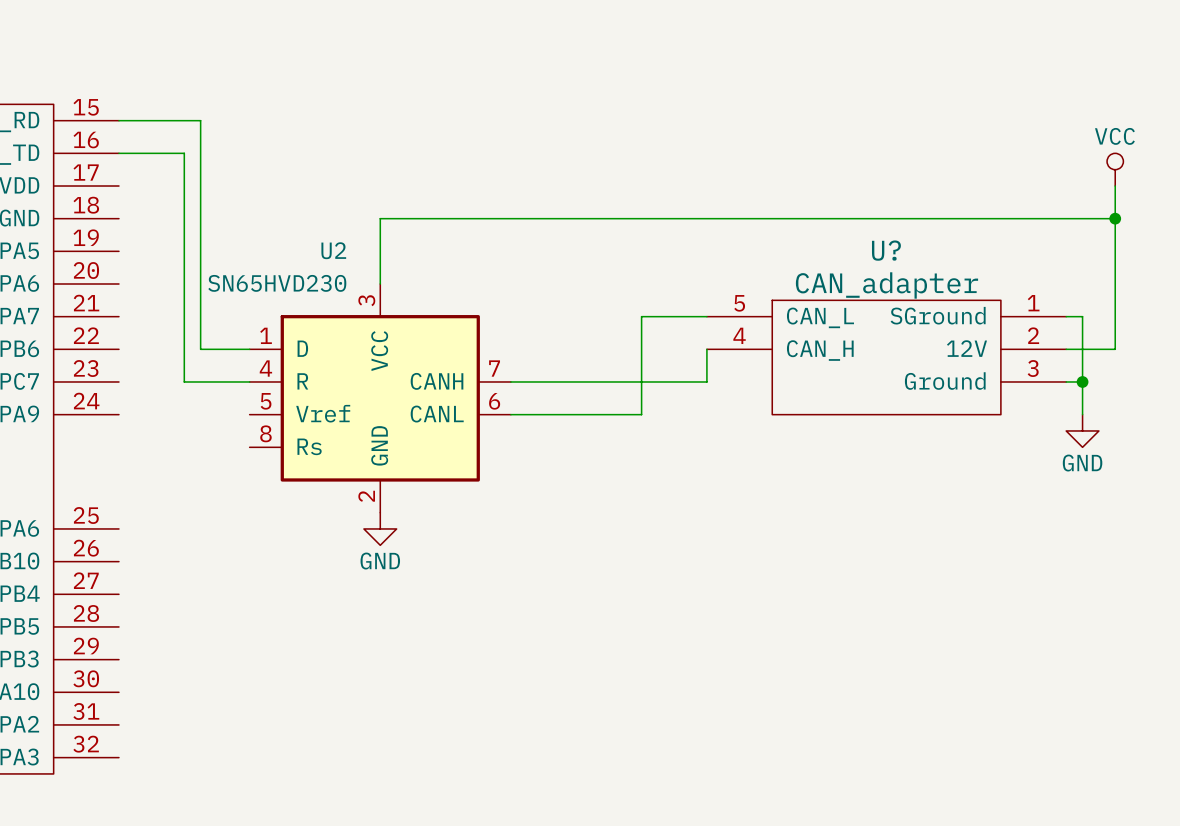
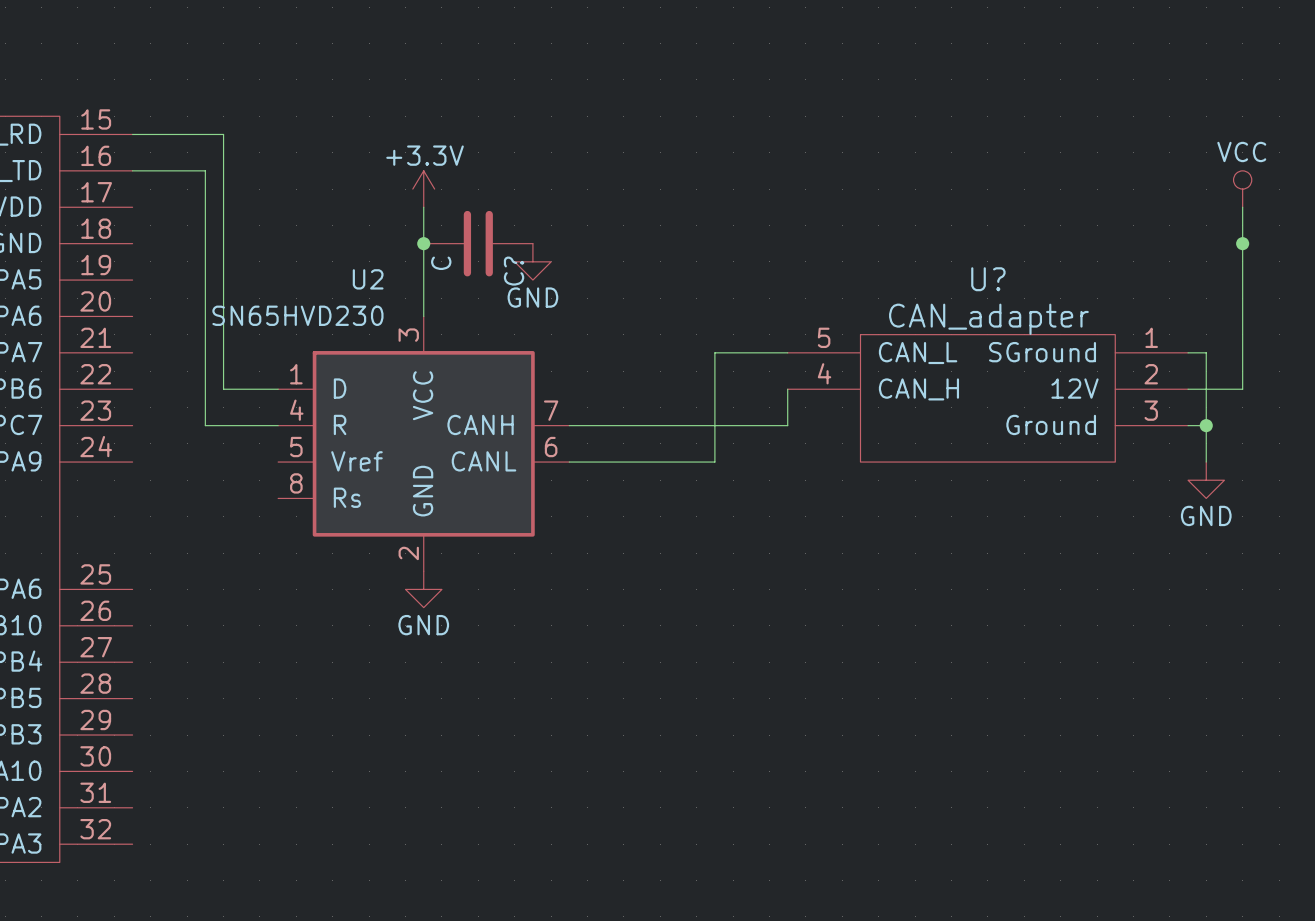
power symbol: none -> +3.3V (423, 189)
wire: (380, 218) (1115, 218) -> (423, 243) (423, 207)
junction: none -> (423, 243)
C?: none -> C (478, 243)
power symbol: none -> GND (532, 261)

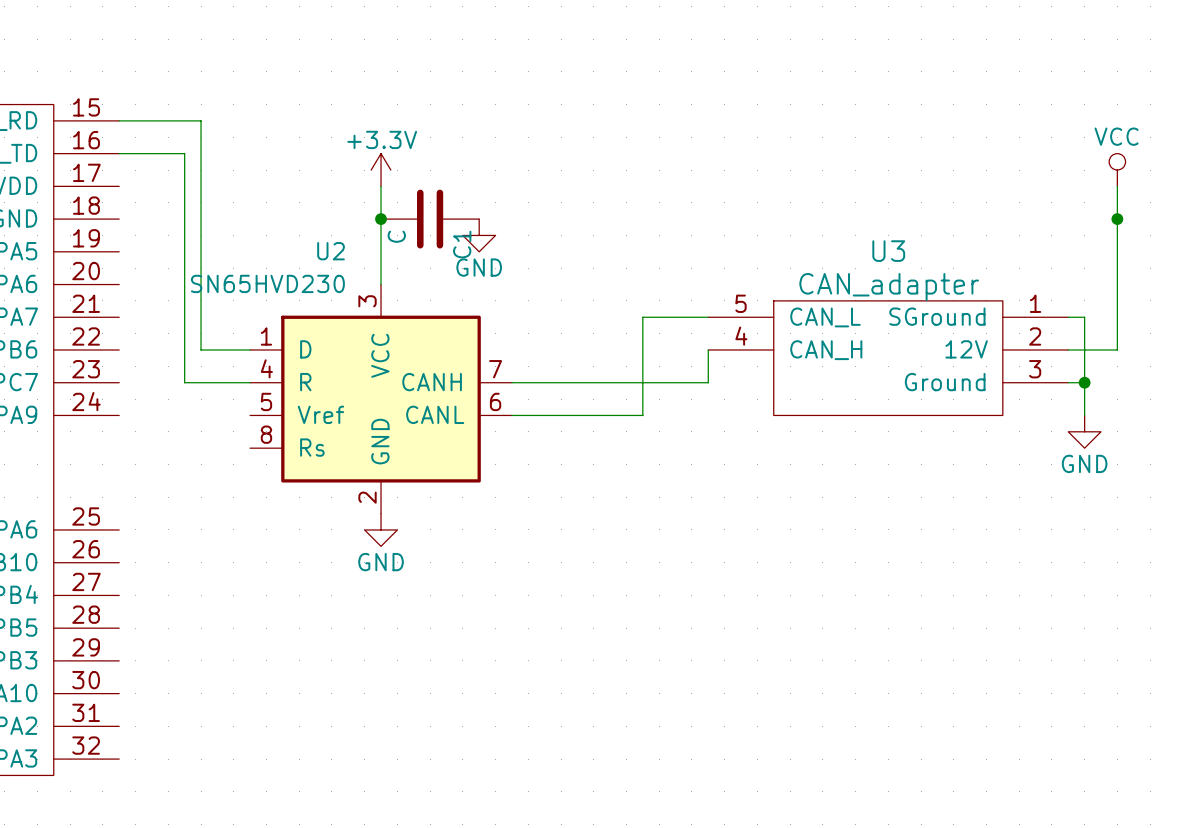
C? name: C? (514, 271) -> C1 (462, 244)
U? name: U? (988, 279) -> U3 (888, 251)

